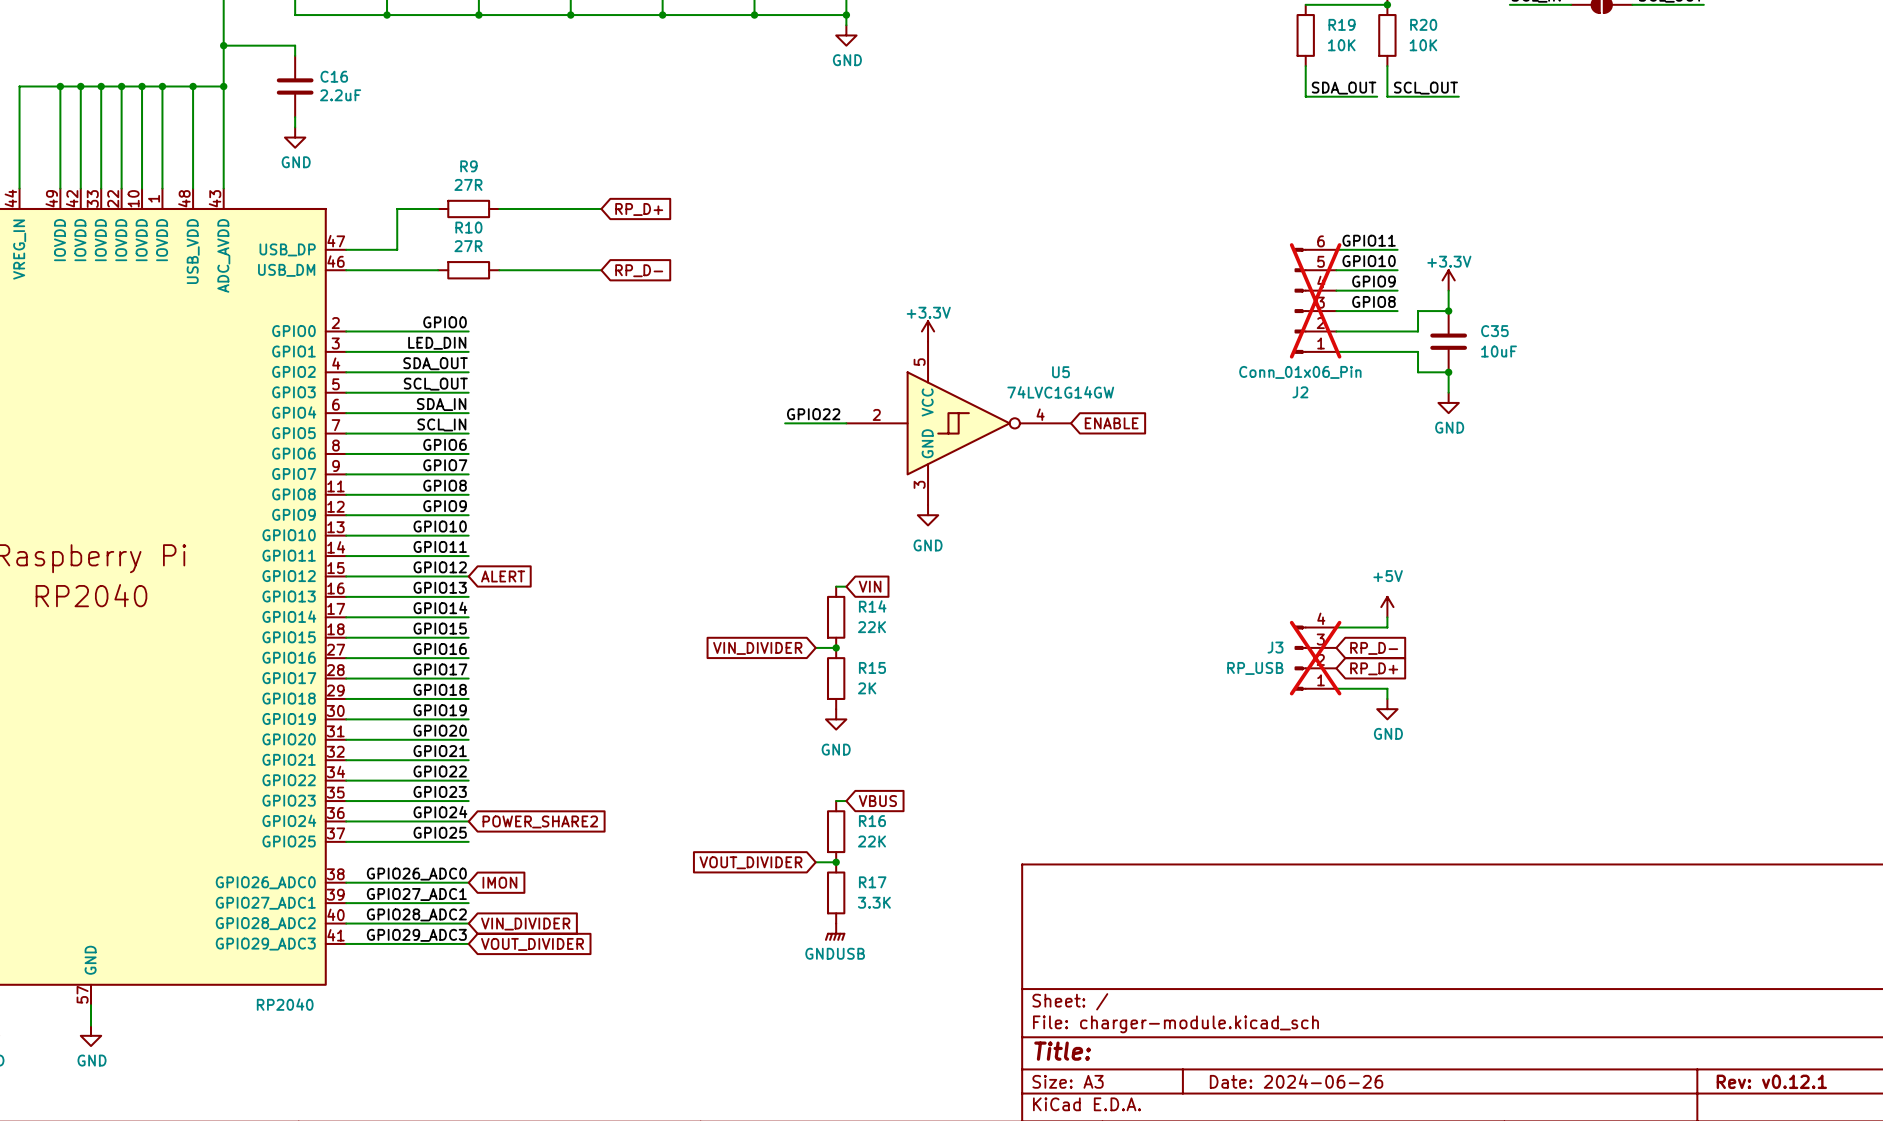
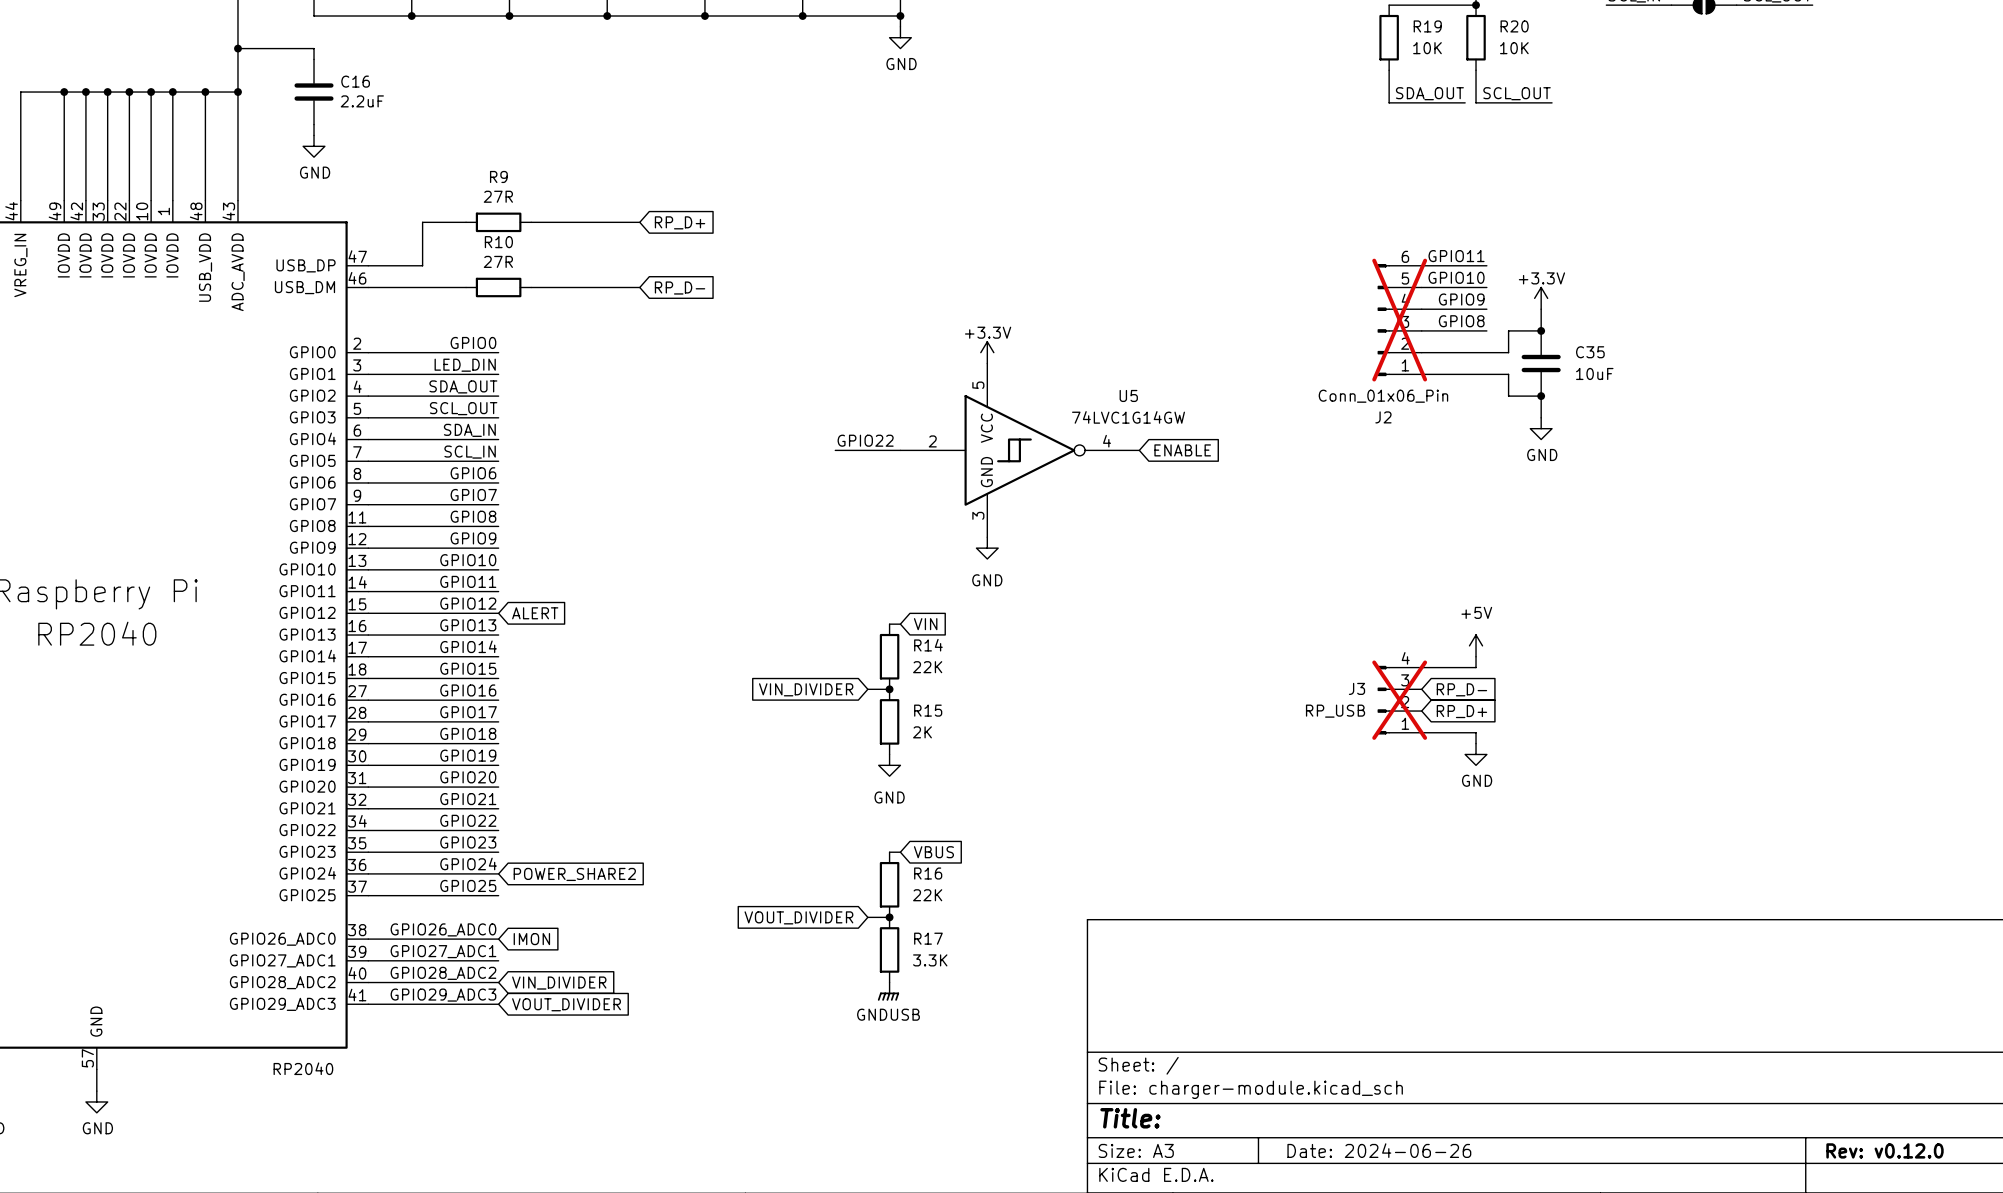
title block: Rev: v0.12.1 (1771, 1081) -> Rev: v0.12.0 (1885, 1150)

